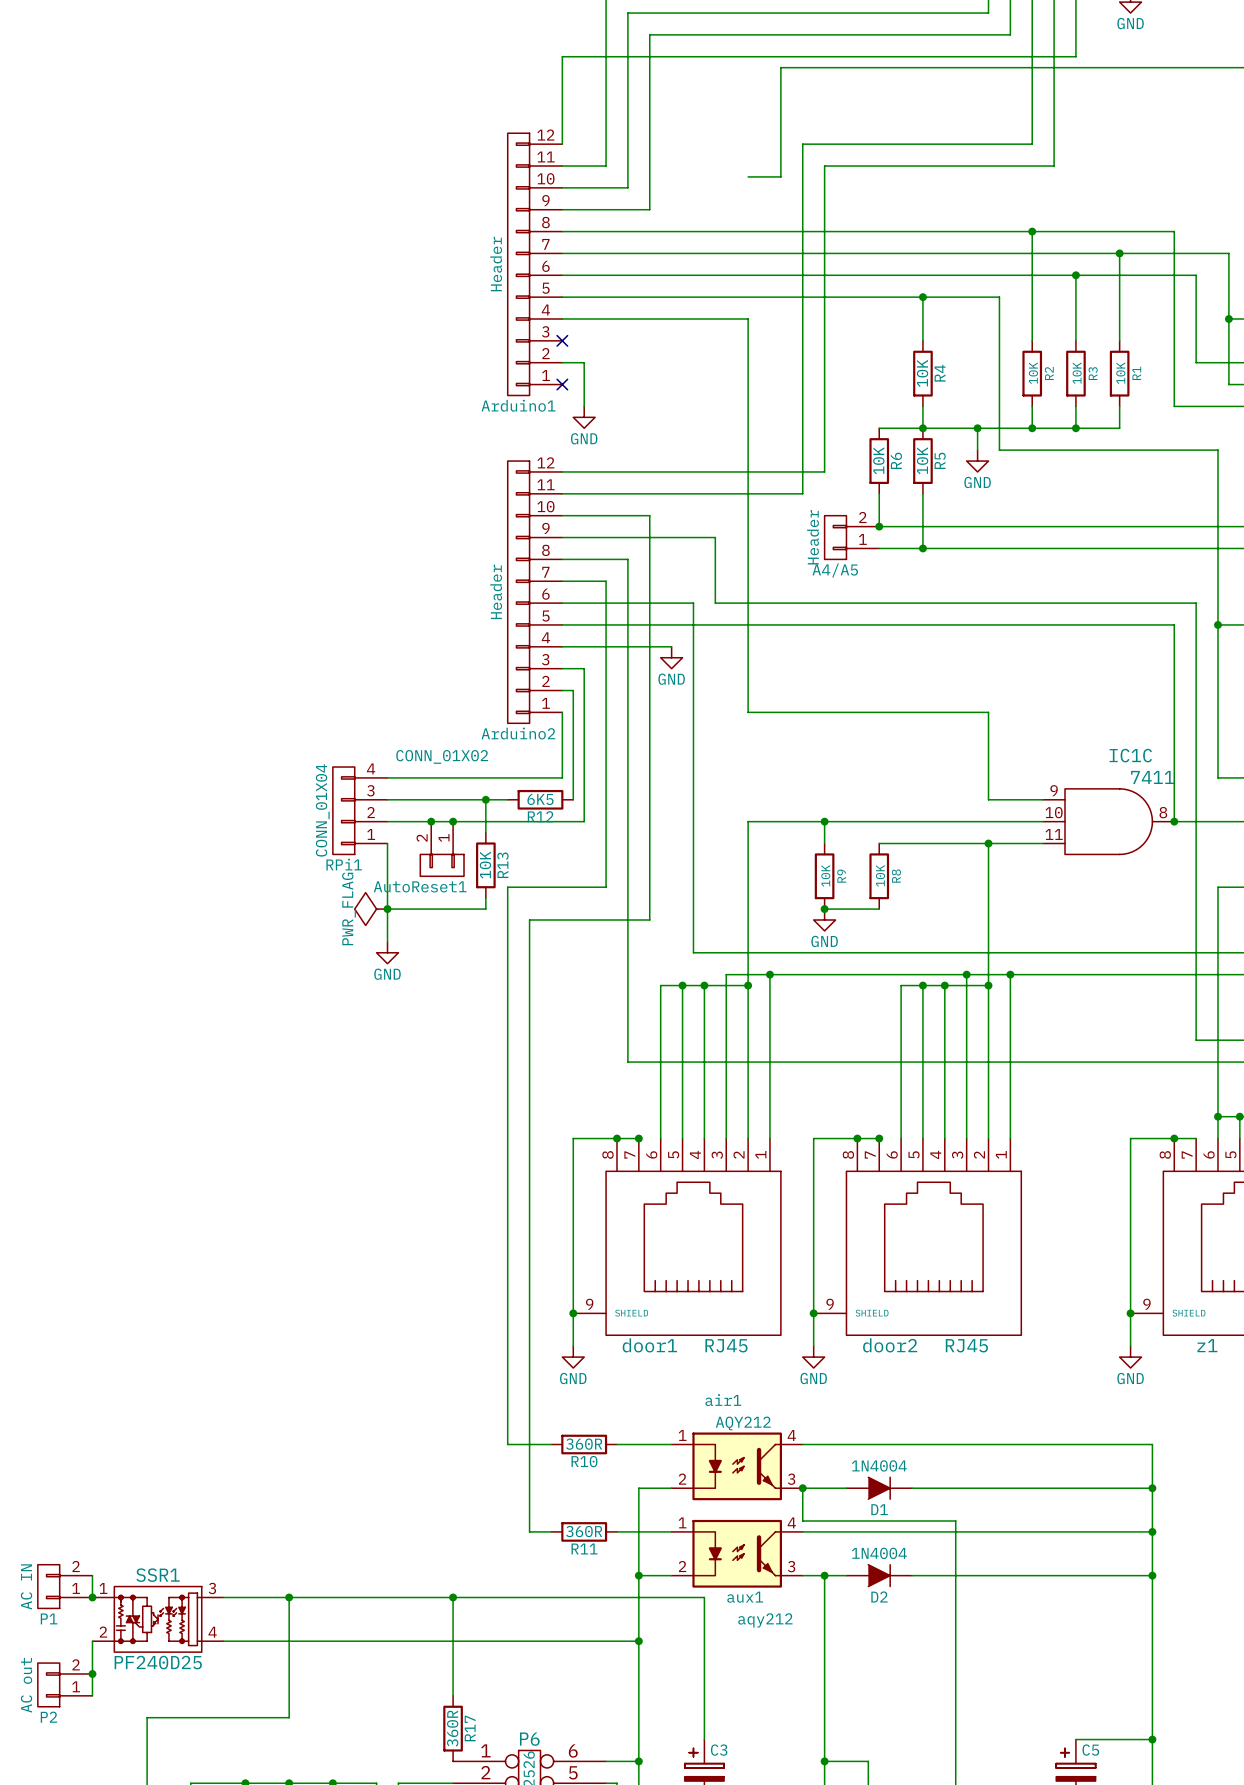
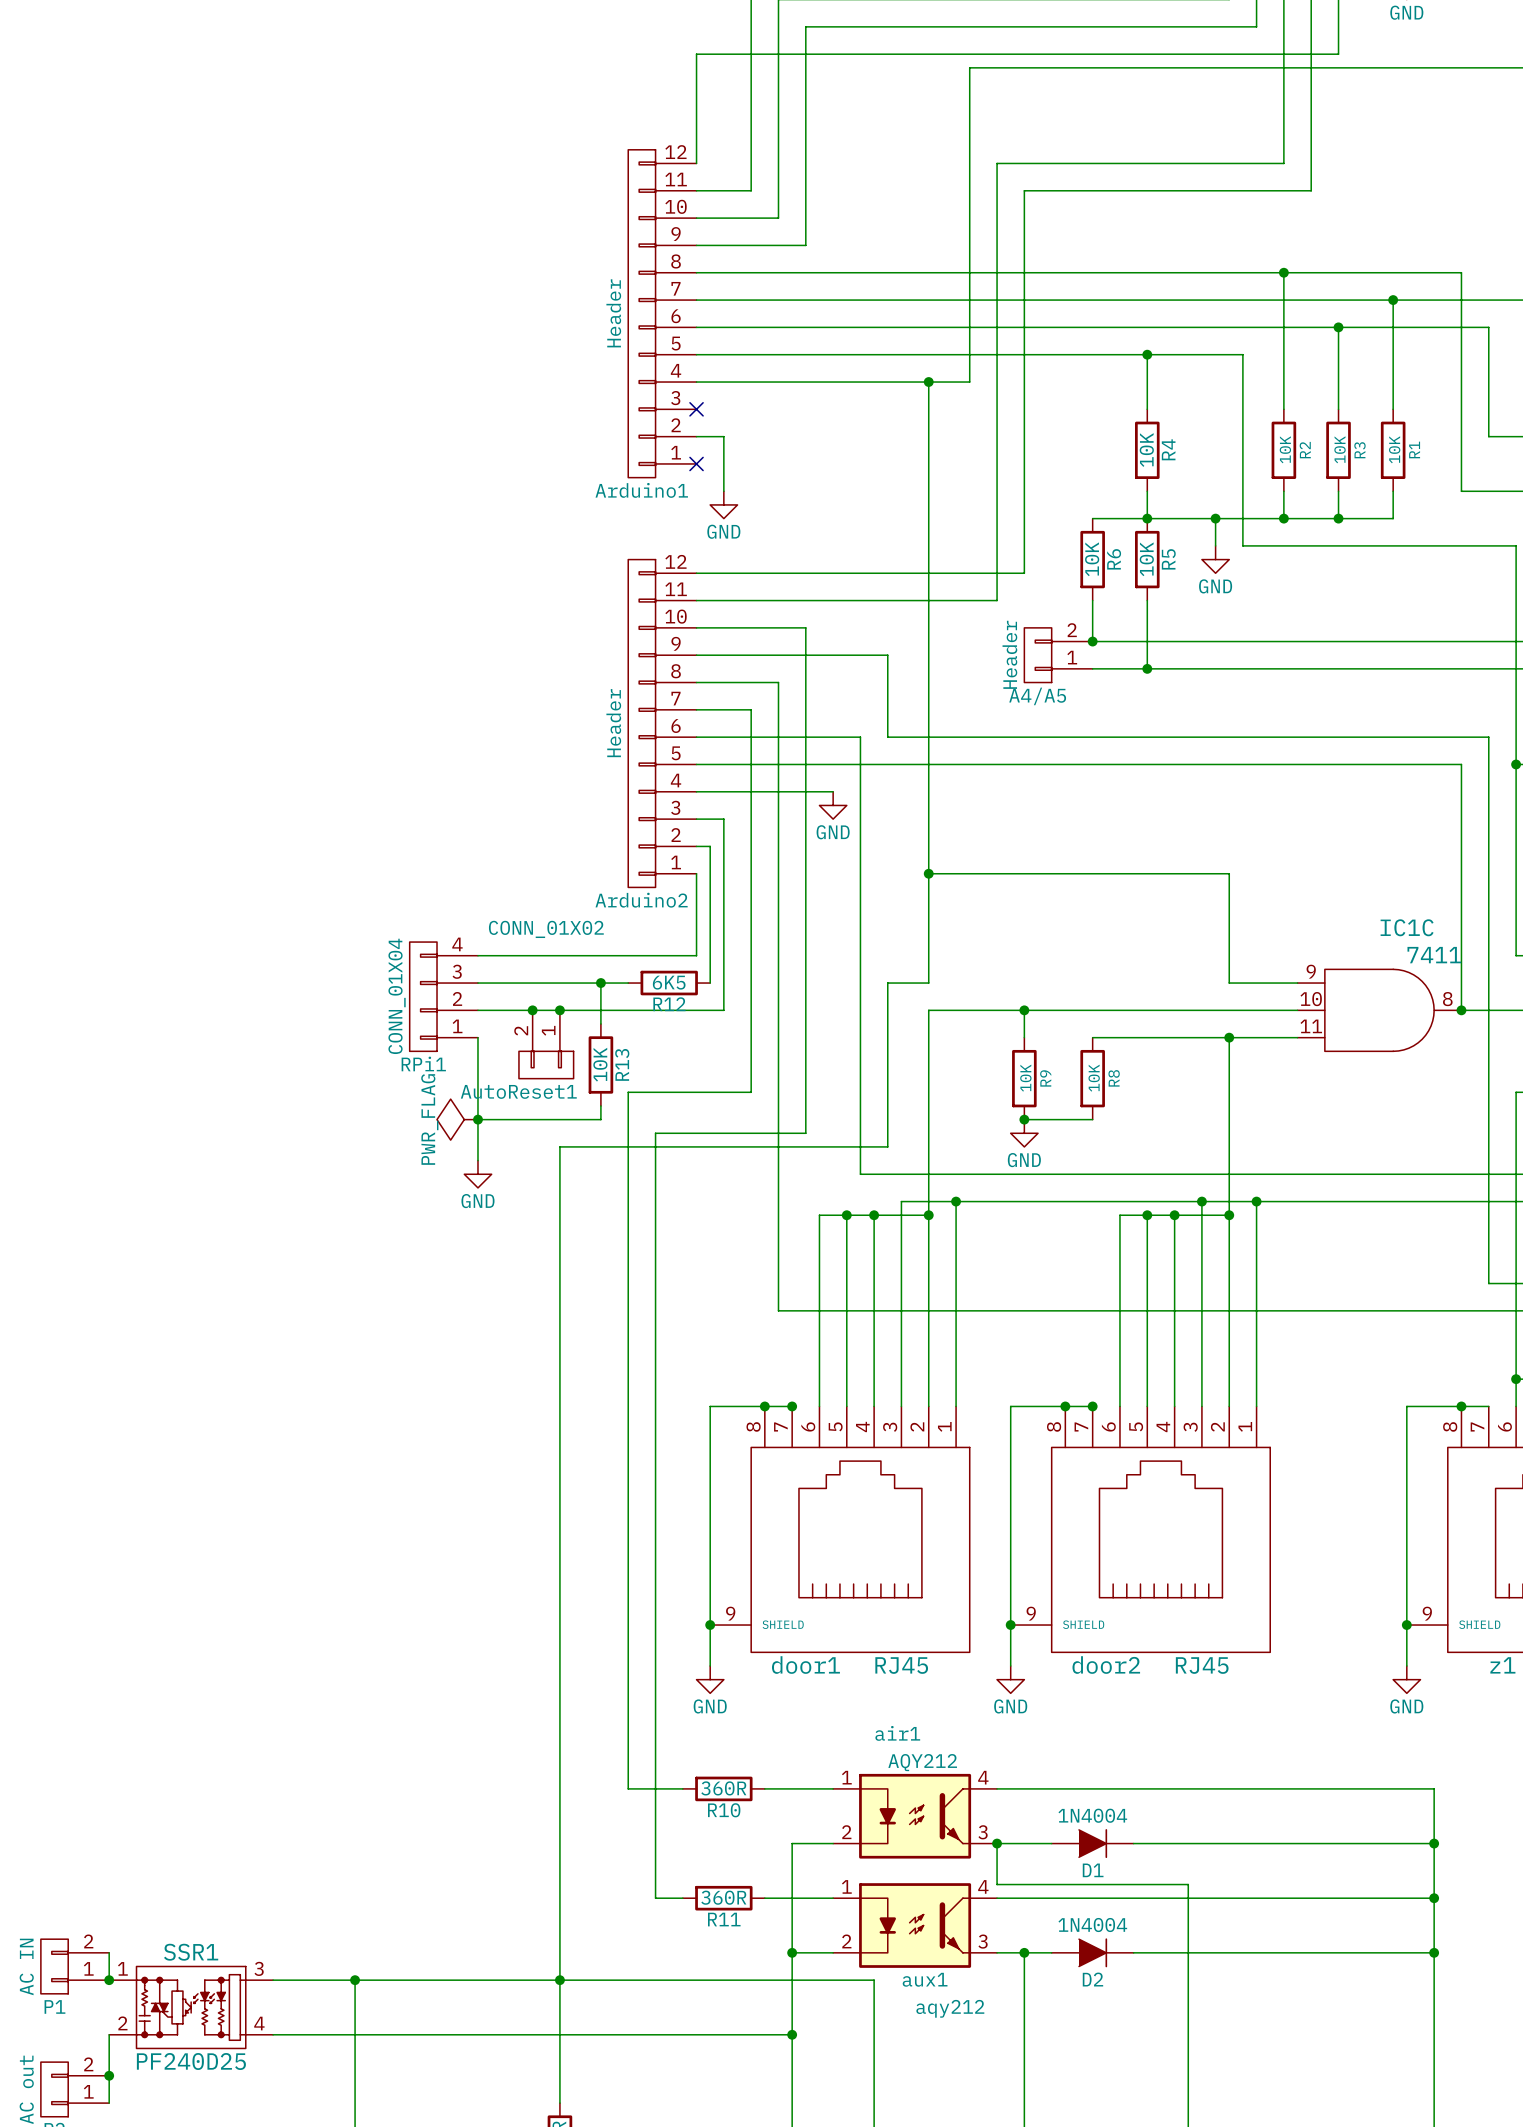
wire: (748, 176) (780, 176) -> (928, 382) (969, 382) (969, 204)
junction: none -> (928, 382)
wire: none -> (928, 873) (928, 983) (887, 983) (887, 1146) (559, 1146) (559, 1980)
junction: none -> (928, 873)

